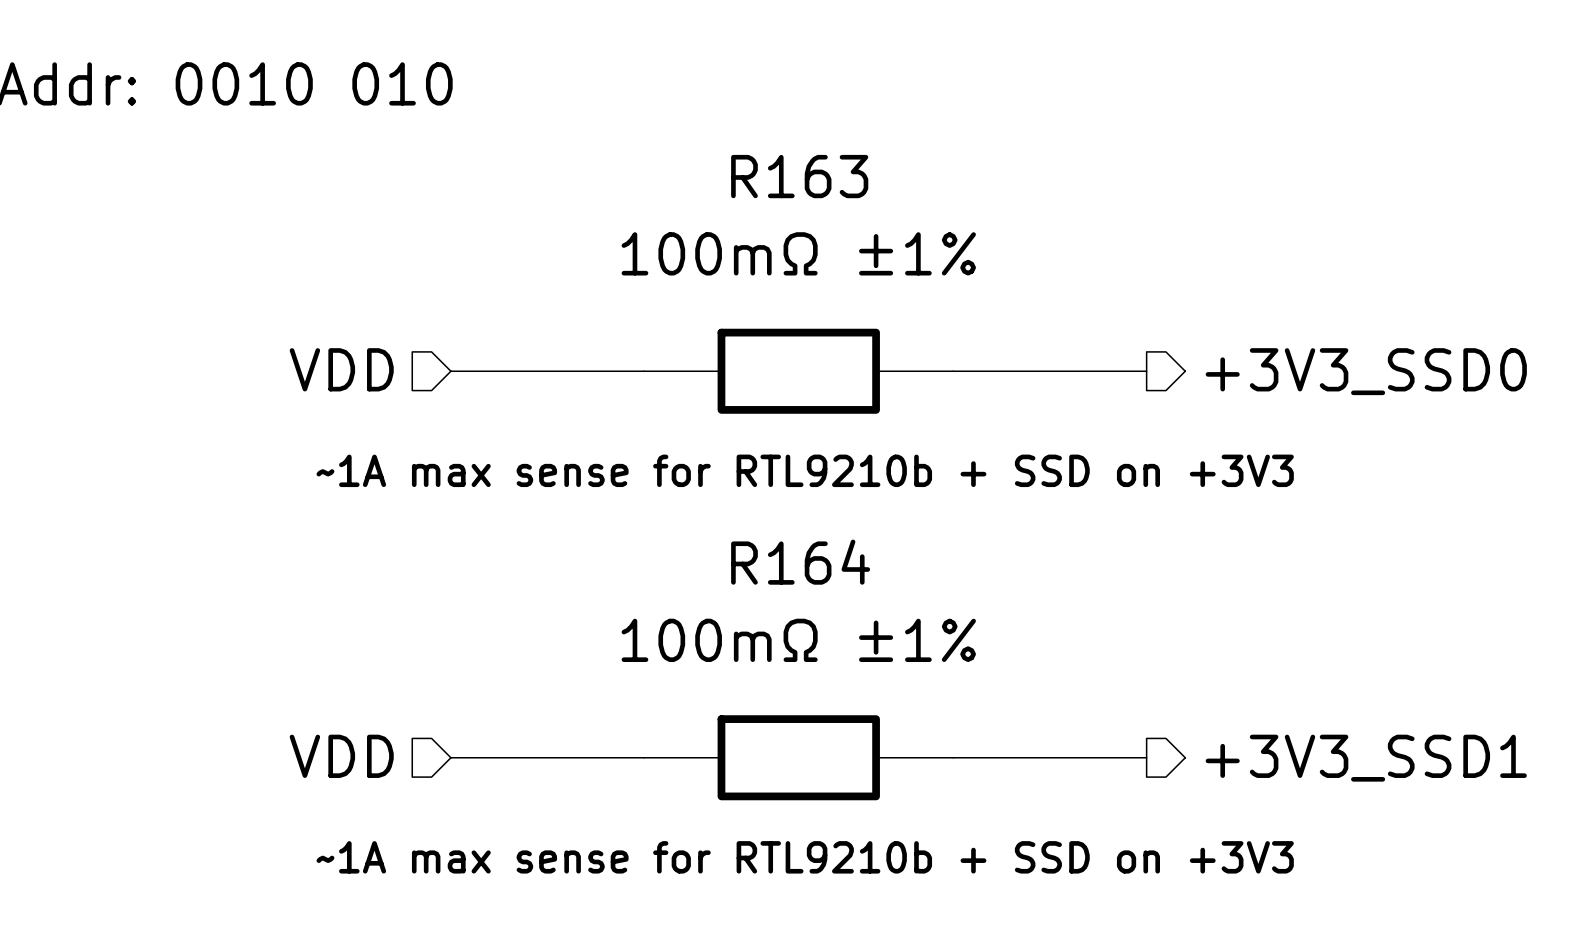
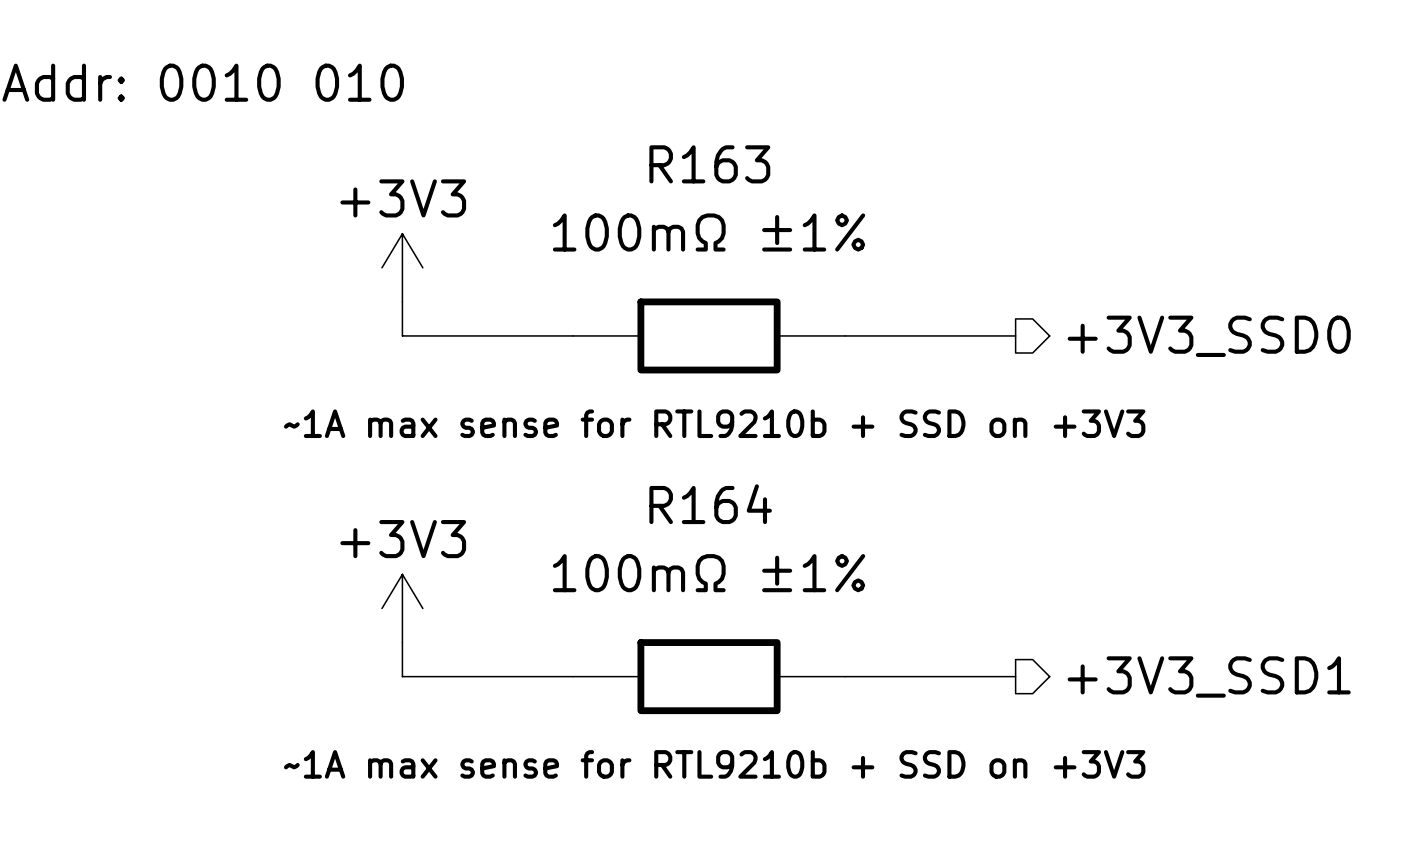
power symbol: none -> +3V3 (402, 267)
wire: none -> (402, 301) (402, 335)
hierarchical label: VDD (341, 369) -> none
power symbol: none -> +3V3 (402, 608)
wire: none -> (402, 642) (402, 676)
hierarchical label: VDD (341, 756) -> none

